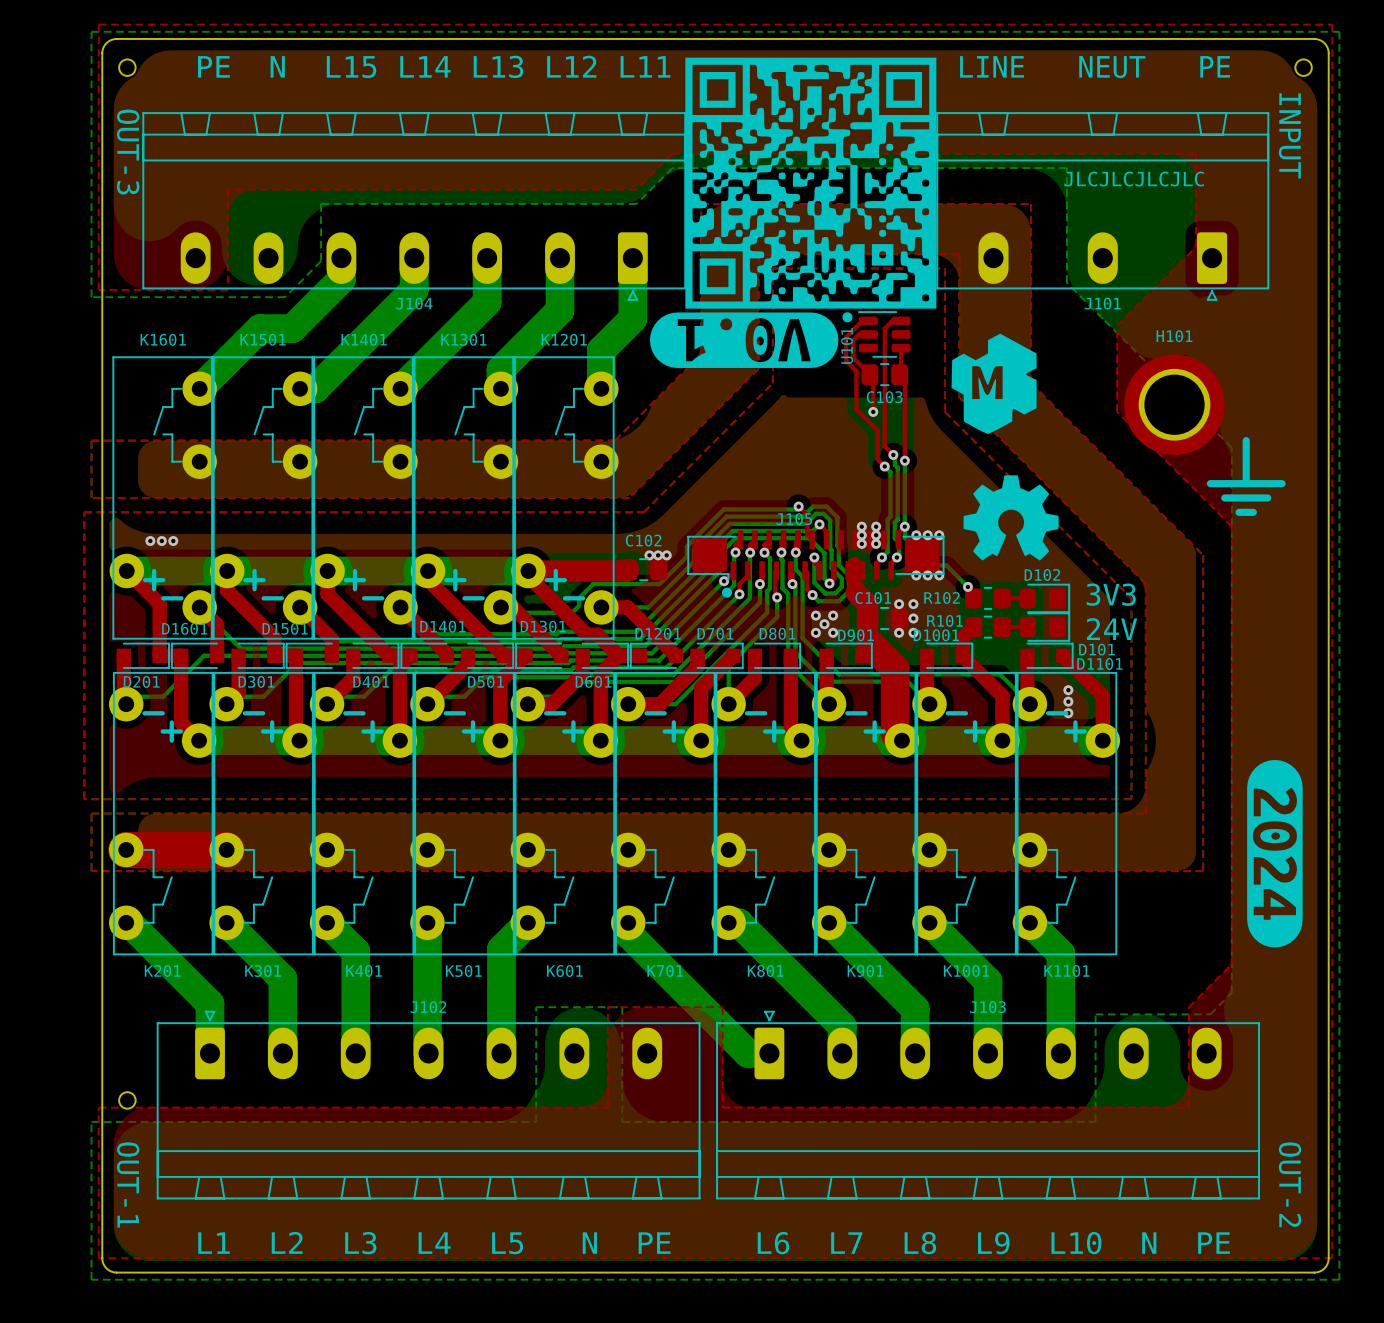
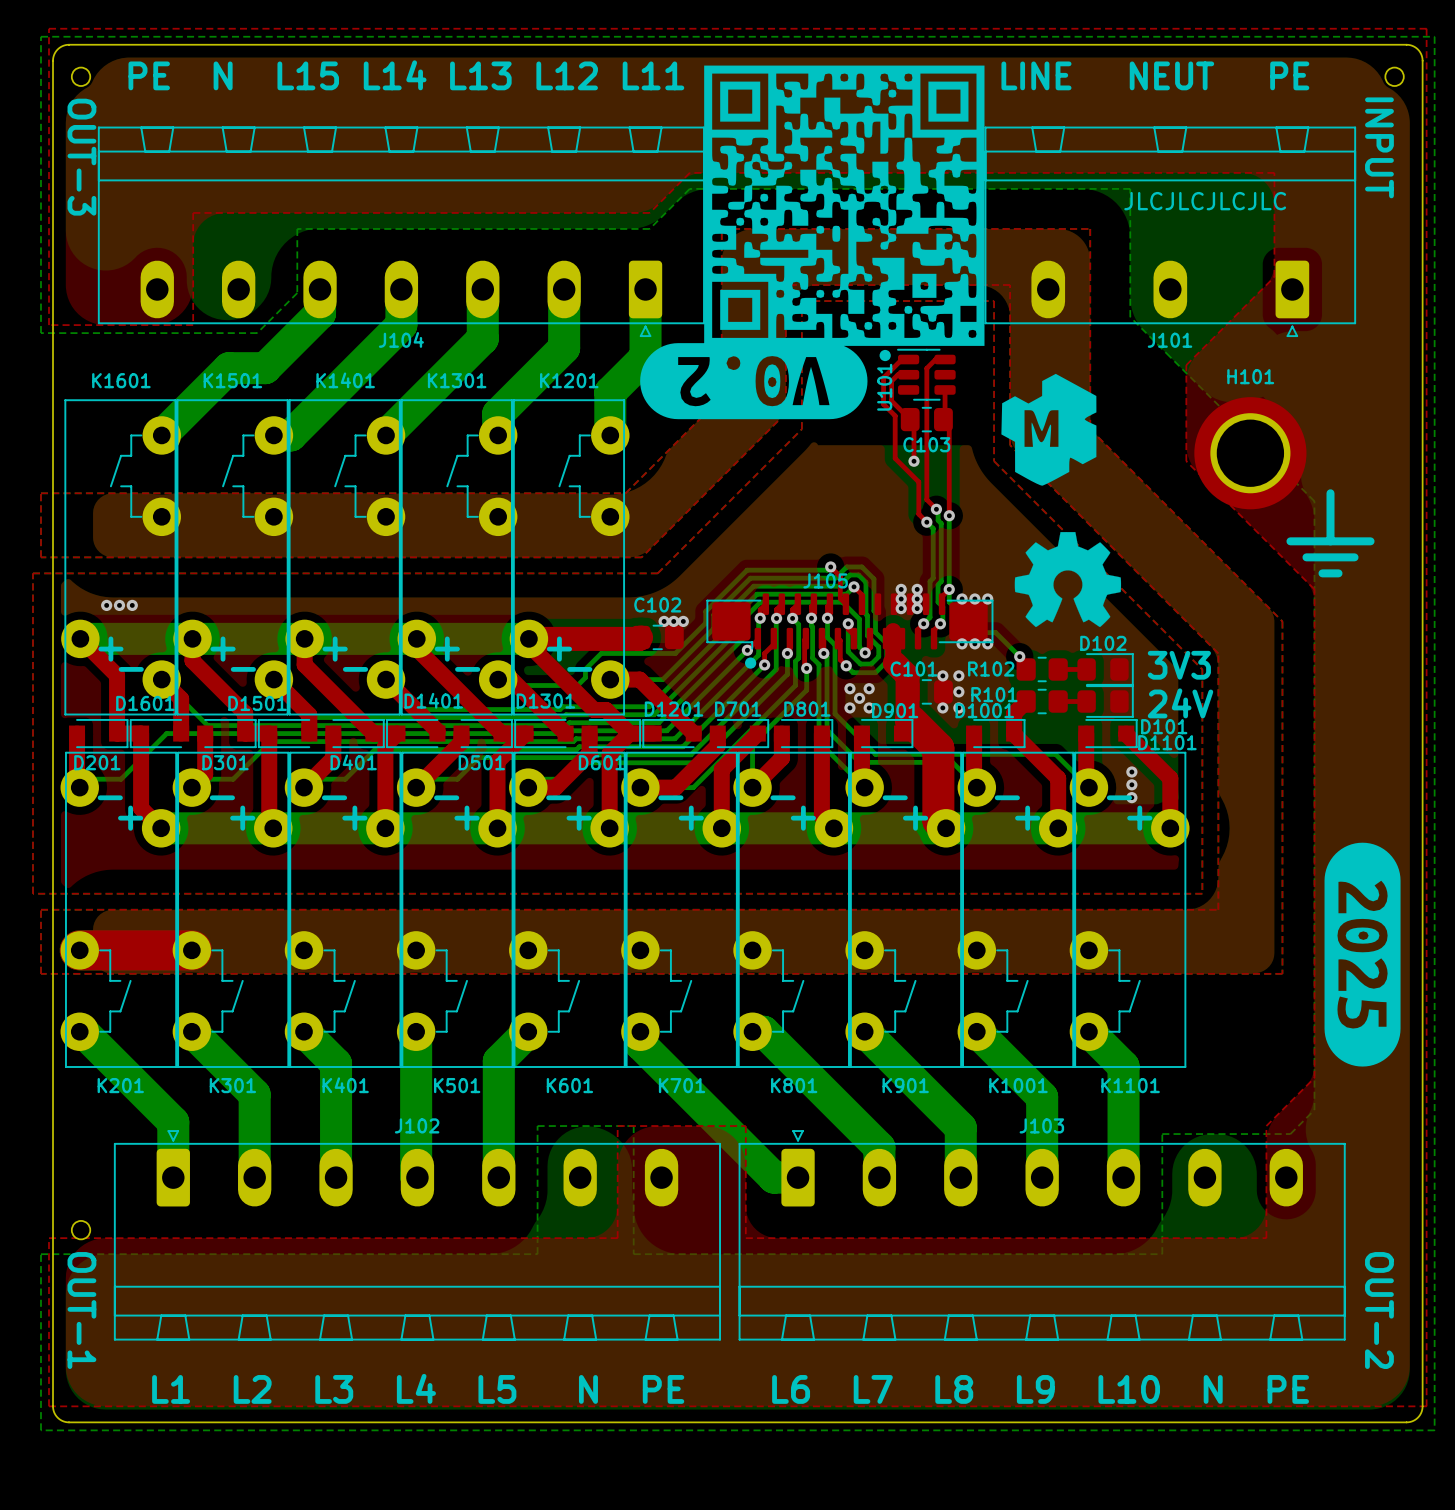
drawing shape: [685, 57, 937, 309] -> [704, 65, 985, 346]
drawing shape: [649, 312, 839, 368] -> [640, 343, 868, 420]
drawing shape: [1247, 759, 1303, 948] -> [1324, 842, 1401, 1067]

